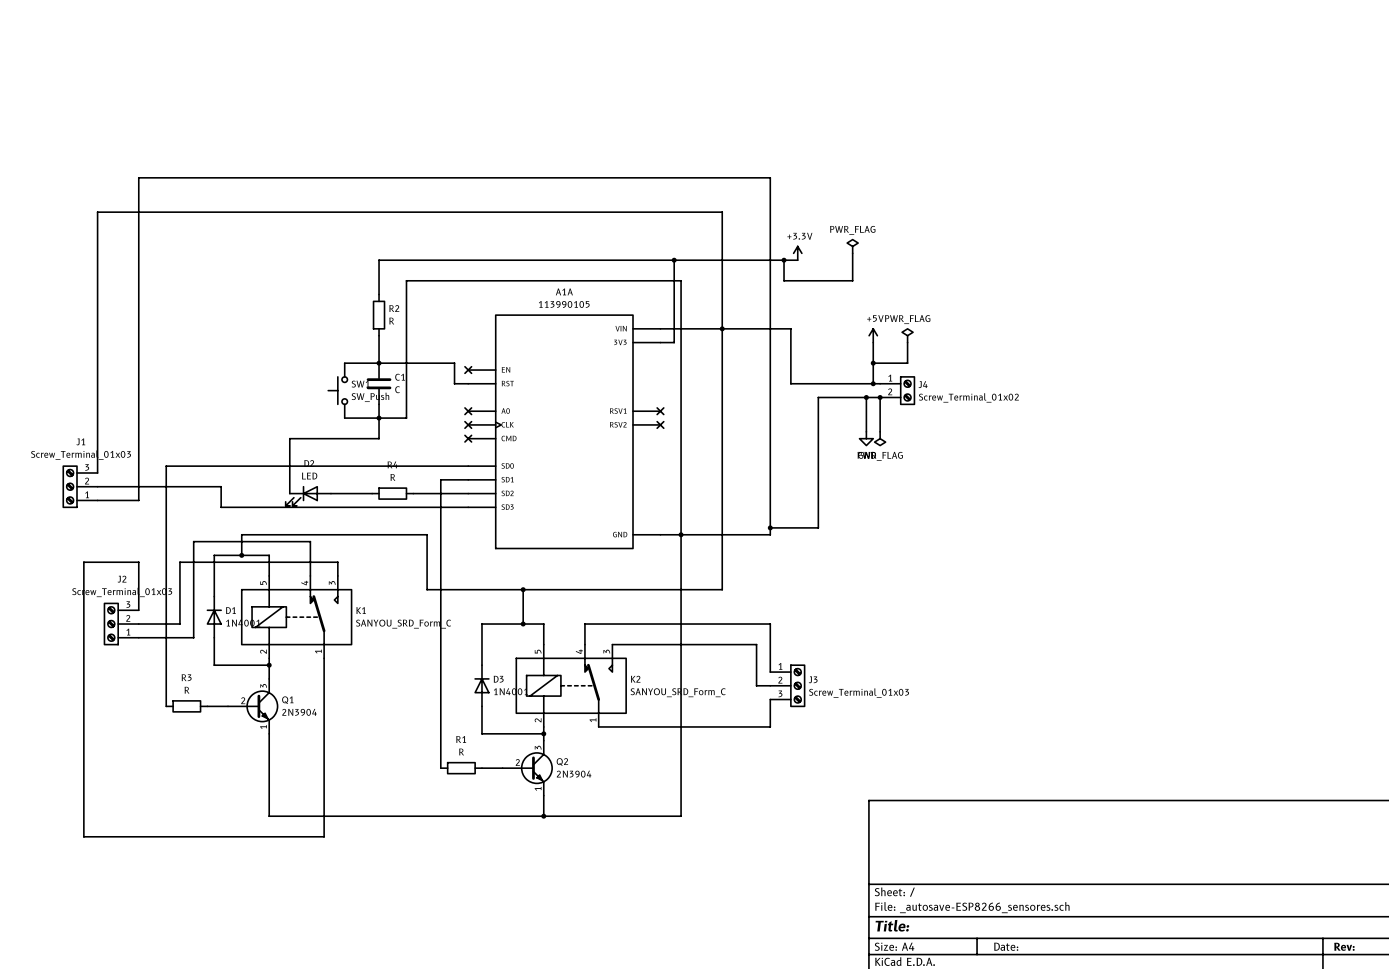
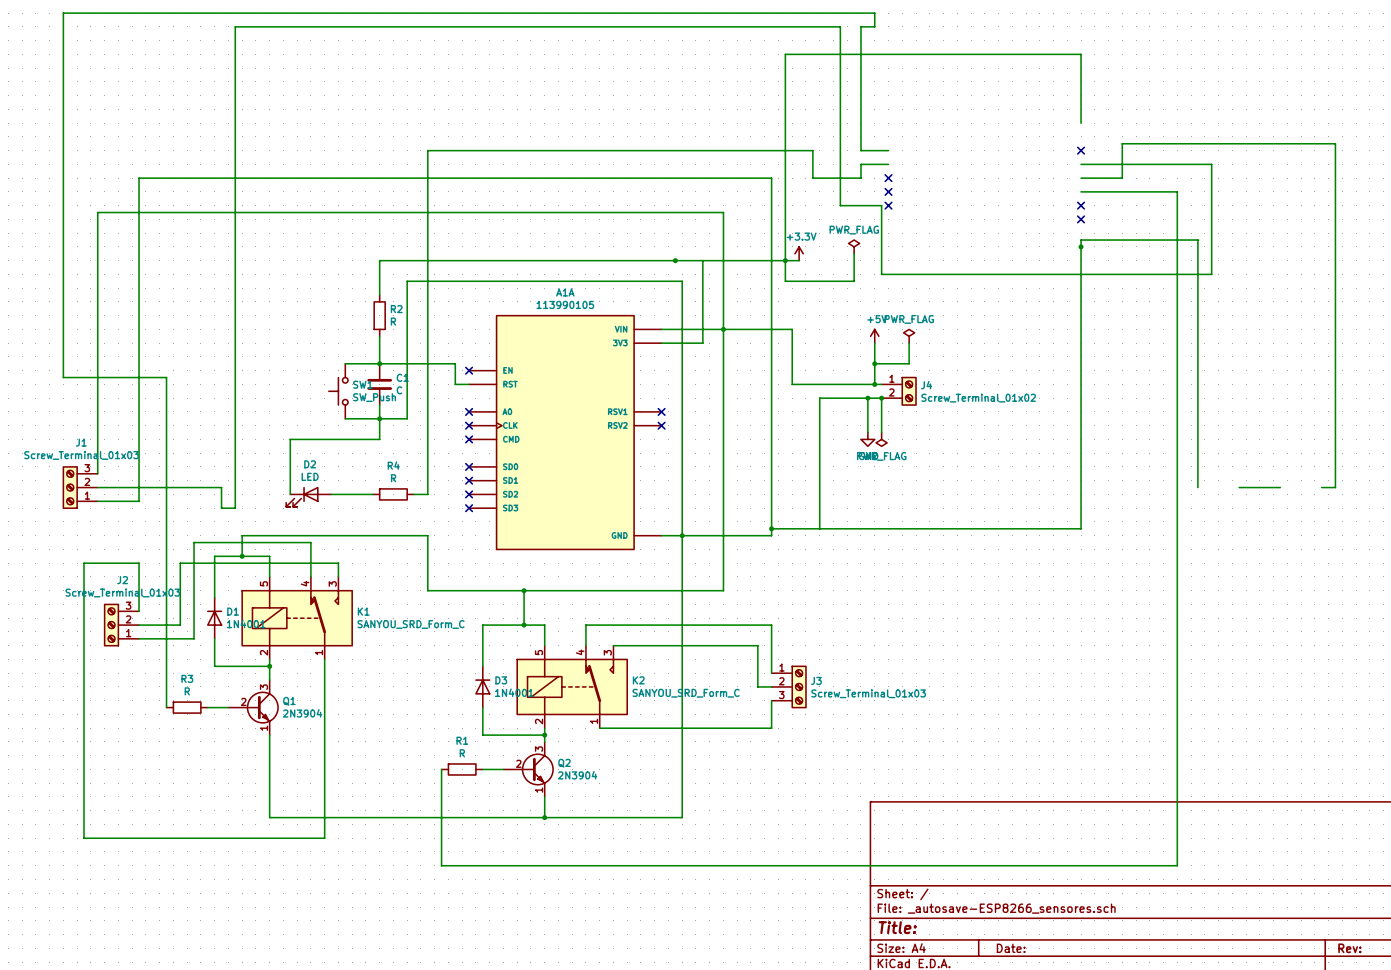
wire: none -> (1081, 123) (1081, 54) (785, 54) (785, 260)
no-connect mark: none -> (1081, 150)
no-connect mark: none -> (888, 178)
wire: none -> (1081, 178) (1122, 178) (1122, 143) (1335, 143) (1335, 487) (1321, 487)
no-connect mark: none -> (888, 191)
no-connect mark: none -> (888, 205)
no-connect mark: none -> (1081, 205)
no-connect mark: none -> (1081, 219)
junction: none -> (1081, 246)
wire: (674, 260) (674, 342) -> (702, 260) (702, 343) (675, 343)
wire: (166, 466) (468, 466) -> (166, 466) (166, 377) (63, 377) (63, 13) (874, 13) (874, 26) (860, 26) (860, 150) (888, 150)
no-connect mark: none -> (469, 466)
wire: (468, 479) (440, 479) (440, 768) -> (1081, 191) (1177, 191) (1177, 865) (441, 865) (441, 769)
no-connect mark: none -> (469, 480)
wire: none -> (1197, 487) (1197, 240) (1081, 240) (1081, 528) (819, 528)
wire: none -> (1239, 487) (1280, 487)
wire: (427, 493) (468, 493) -> (427, 494) (427, 150) (812, 150) (812, 178) (860, 178) (860, 164) (888, 164)
no-connect mark: none -> (469, 494)
wire: (234, 507) (468, 507) -> (235, 508) (235, 26) (840, 26) (840, 205) (881, 205) (881, 274) (1211, 274) (1211, 164) (1081, 164)
no-connect mark: none -> (469, 508)

